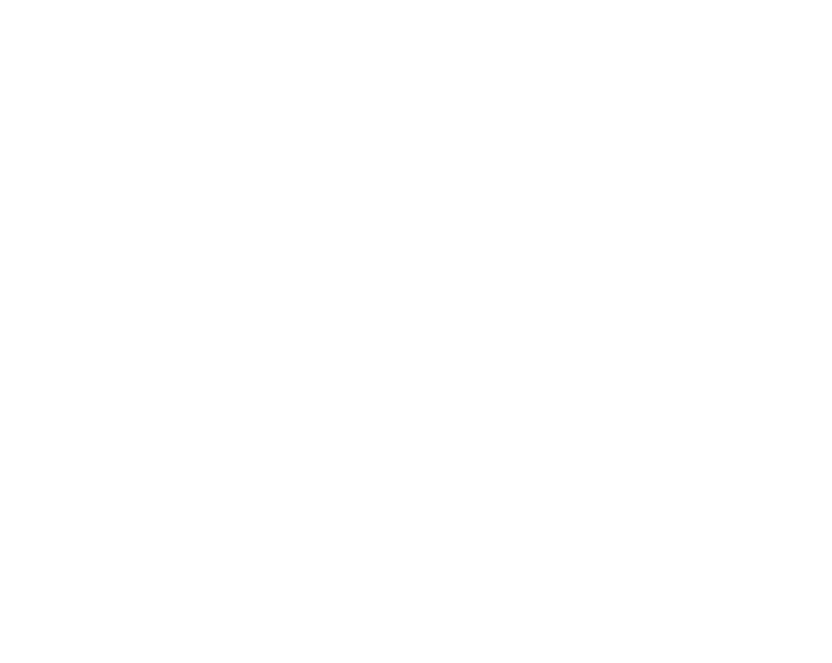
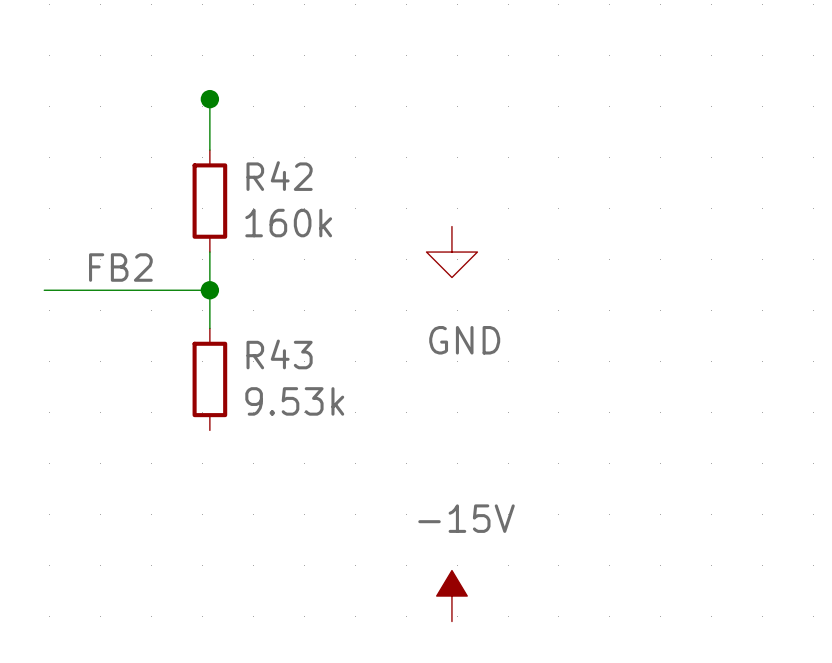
wire: none -> (209, 99) (209, 150)
junction: none -> (209, 99)
R42: none -> 160k (209, 201)
wire: none -> (209, 252) (209, 328)
power symbol: none -> GND (451, 252)
label: none -> FB2 (120, 267)
wire: none -> (44, 290) (209, 290)
junction: none -> (209, 290)
R43: none -> 9.53k (209, 379)
power symbol: none -> -15V (451, 596)

